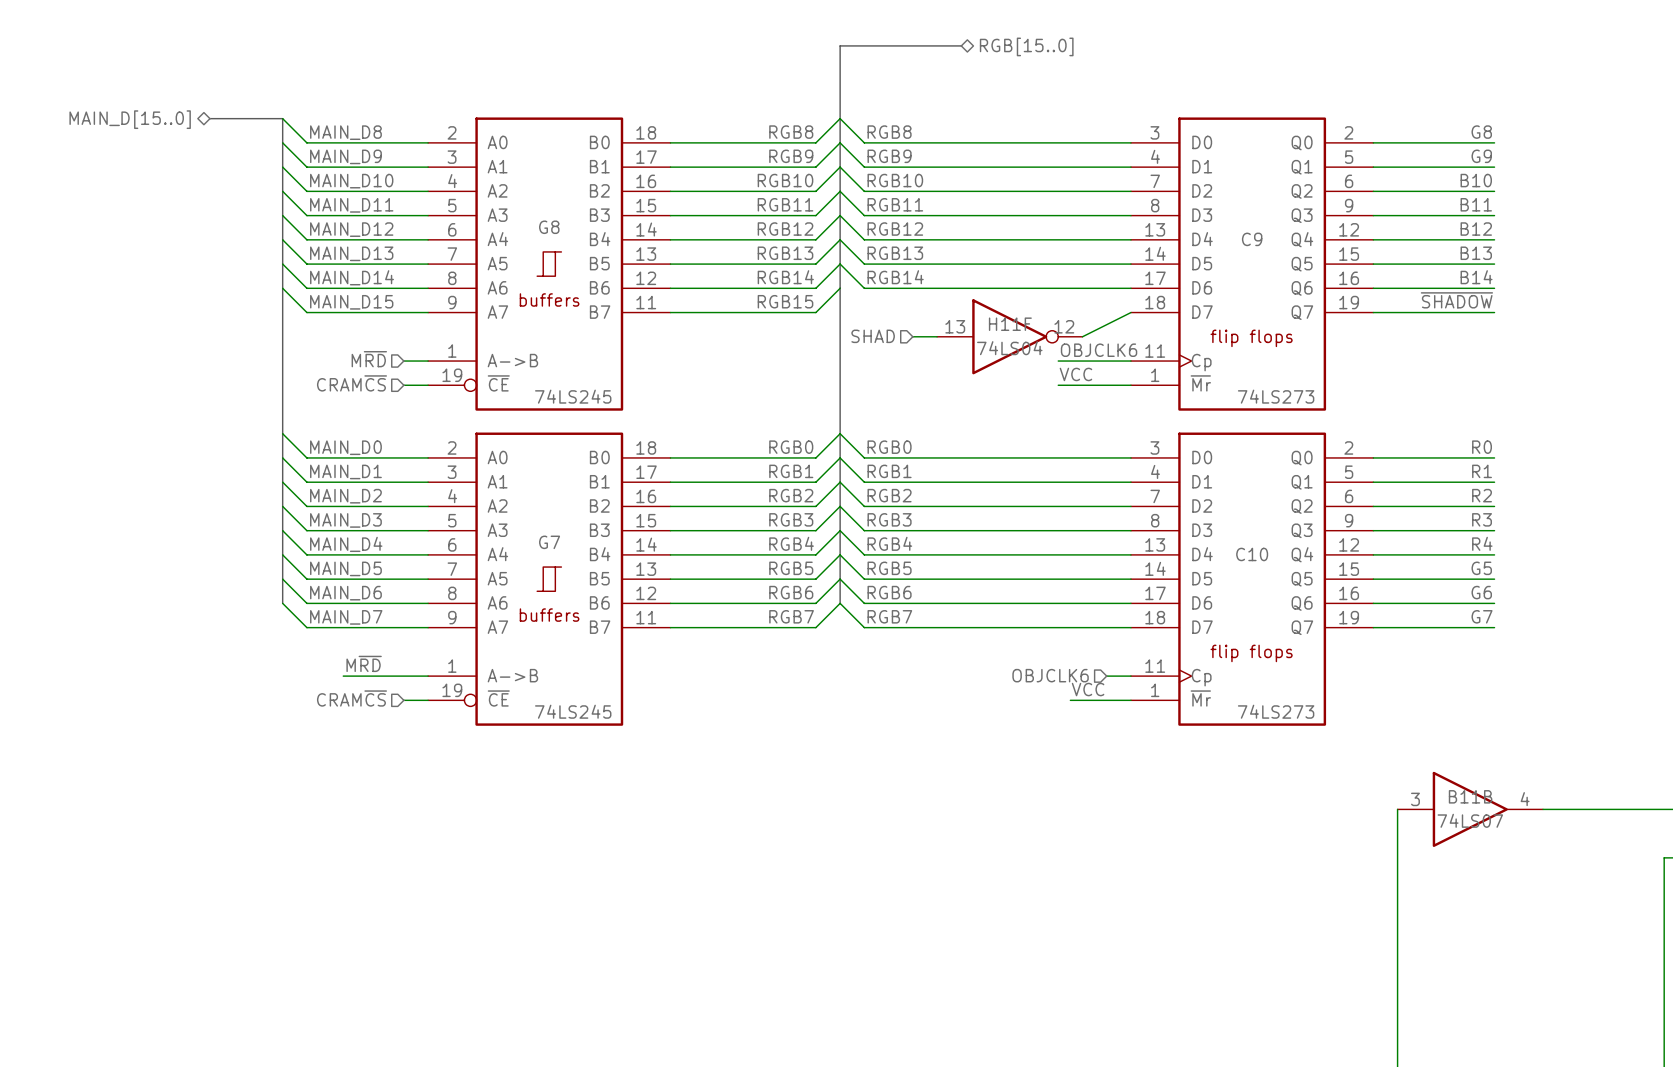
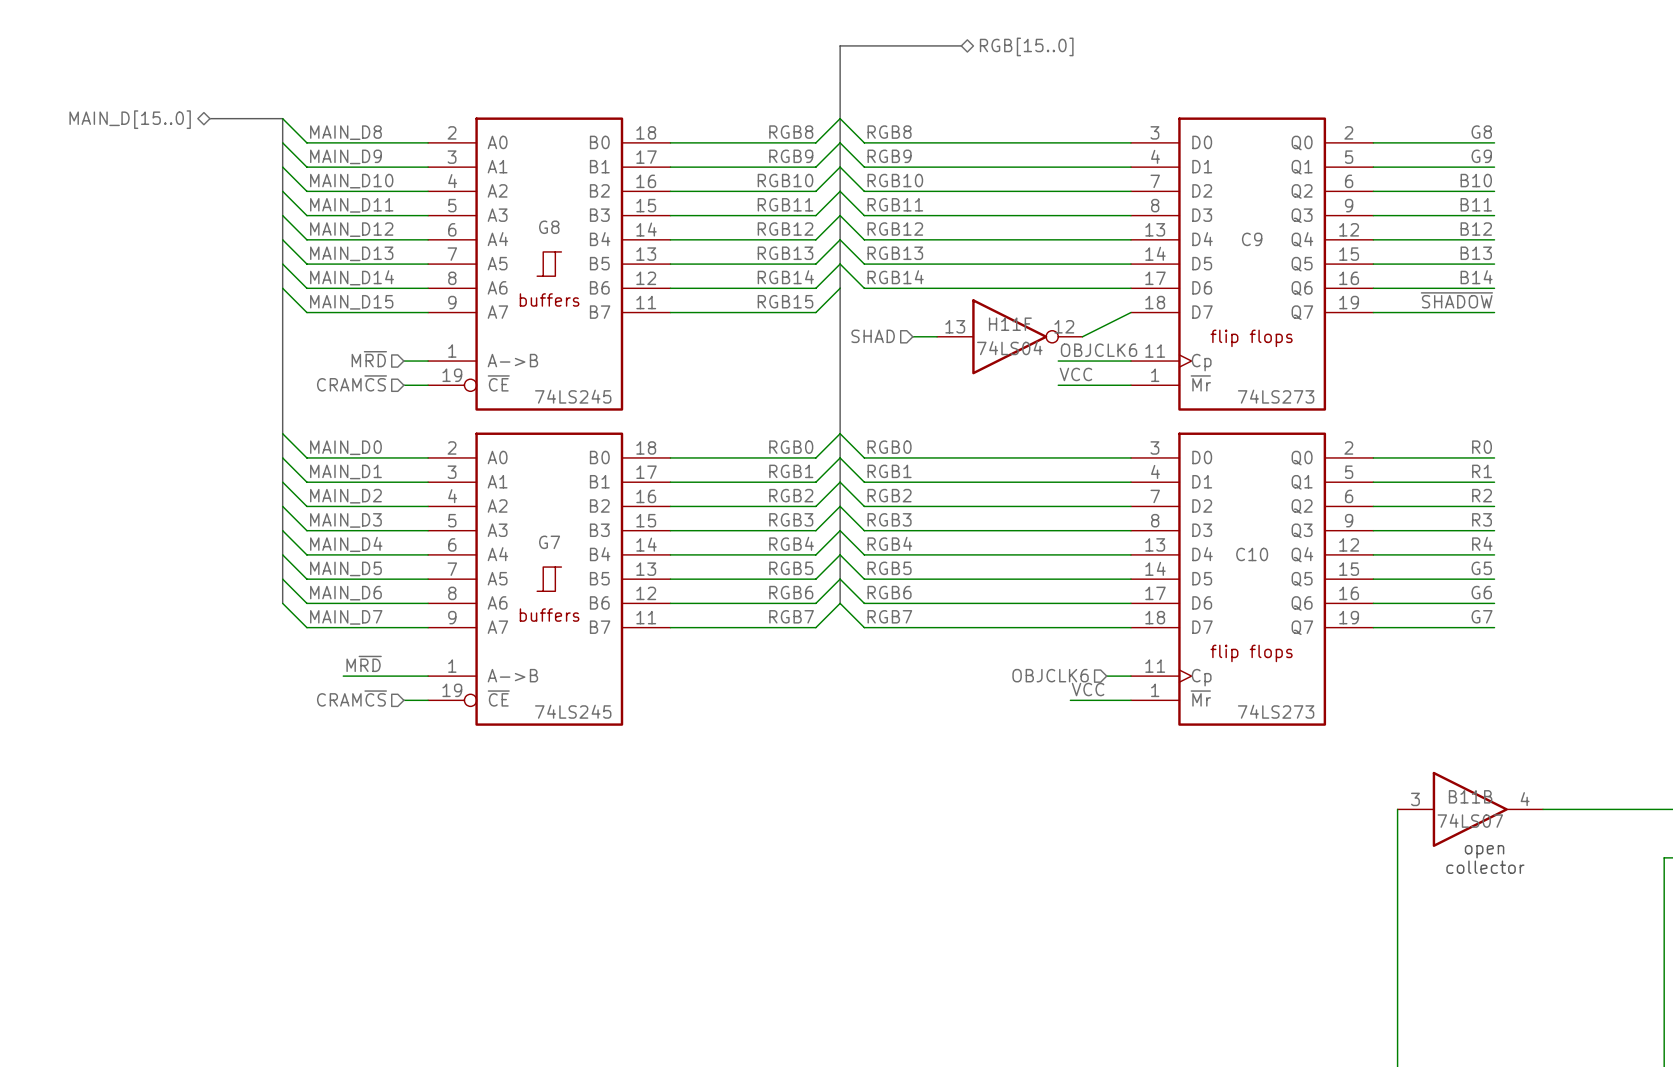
text: none -> open (1484, 851)
text: none -> collector (1485, 867)

